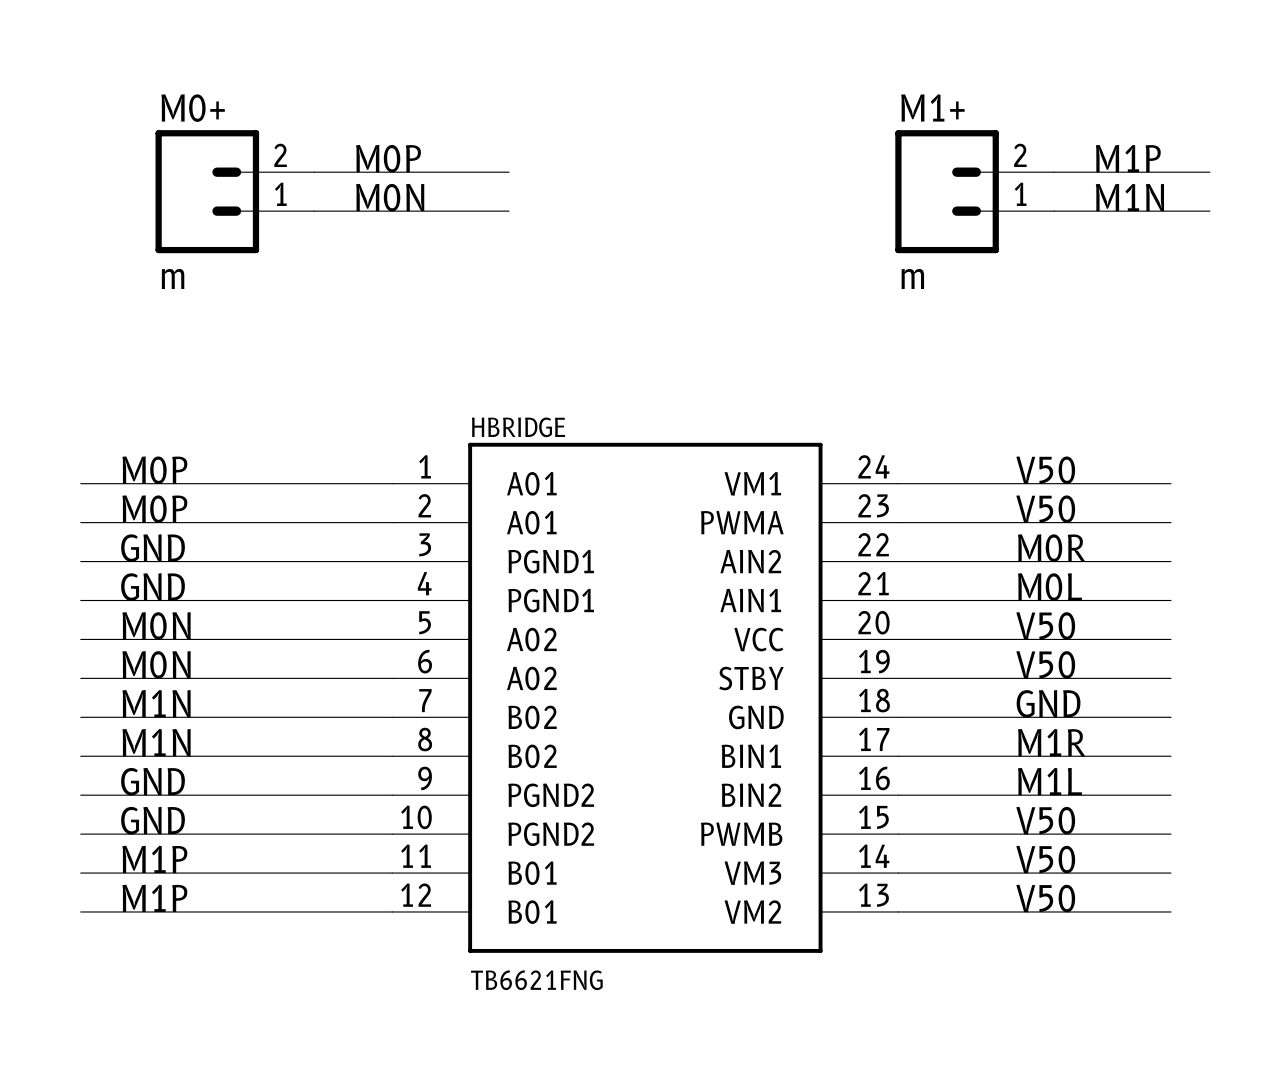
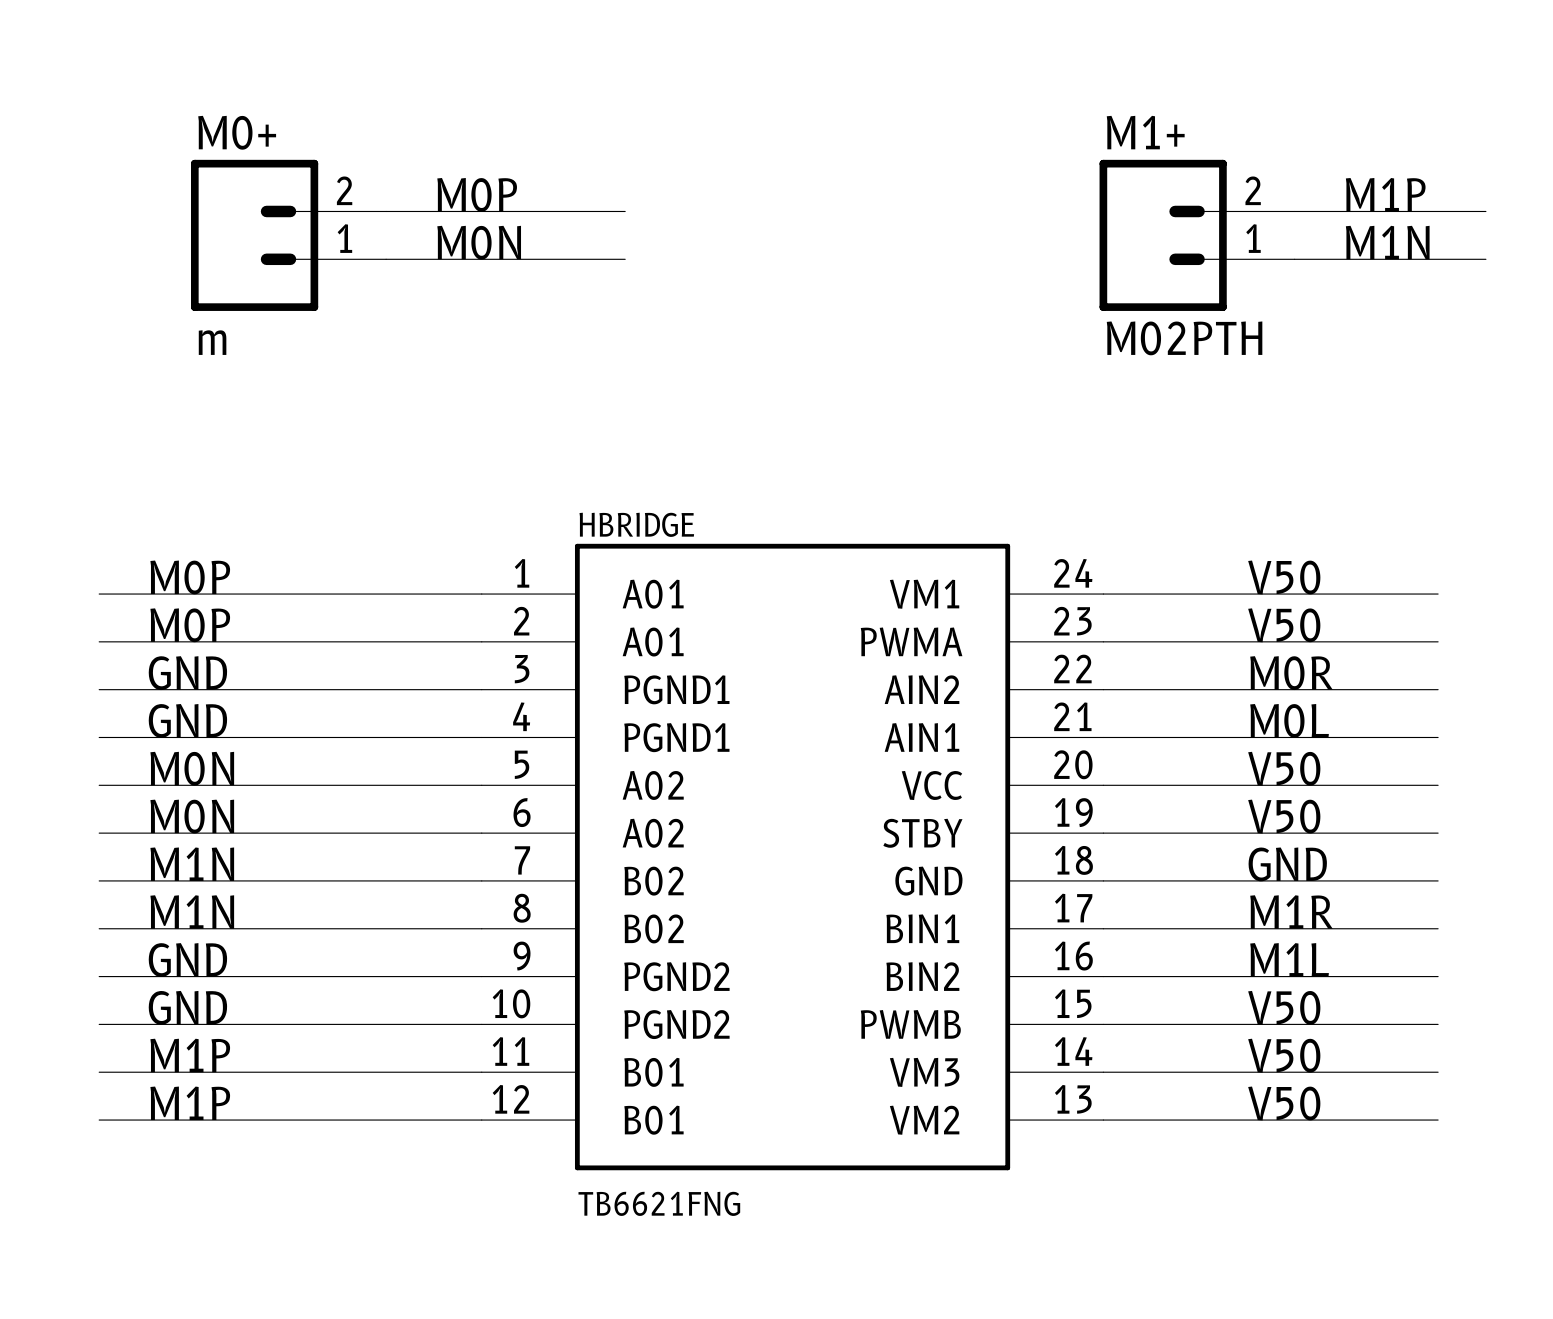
M1+ value: m (912, 278) -> M02PTH (1184, 338)

